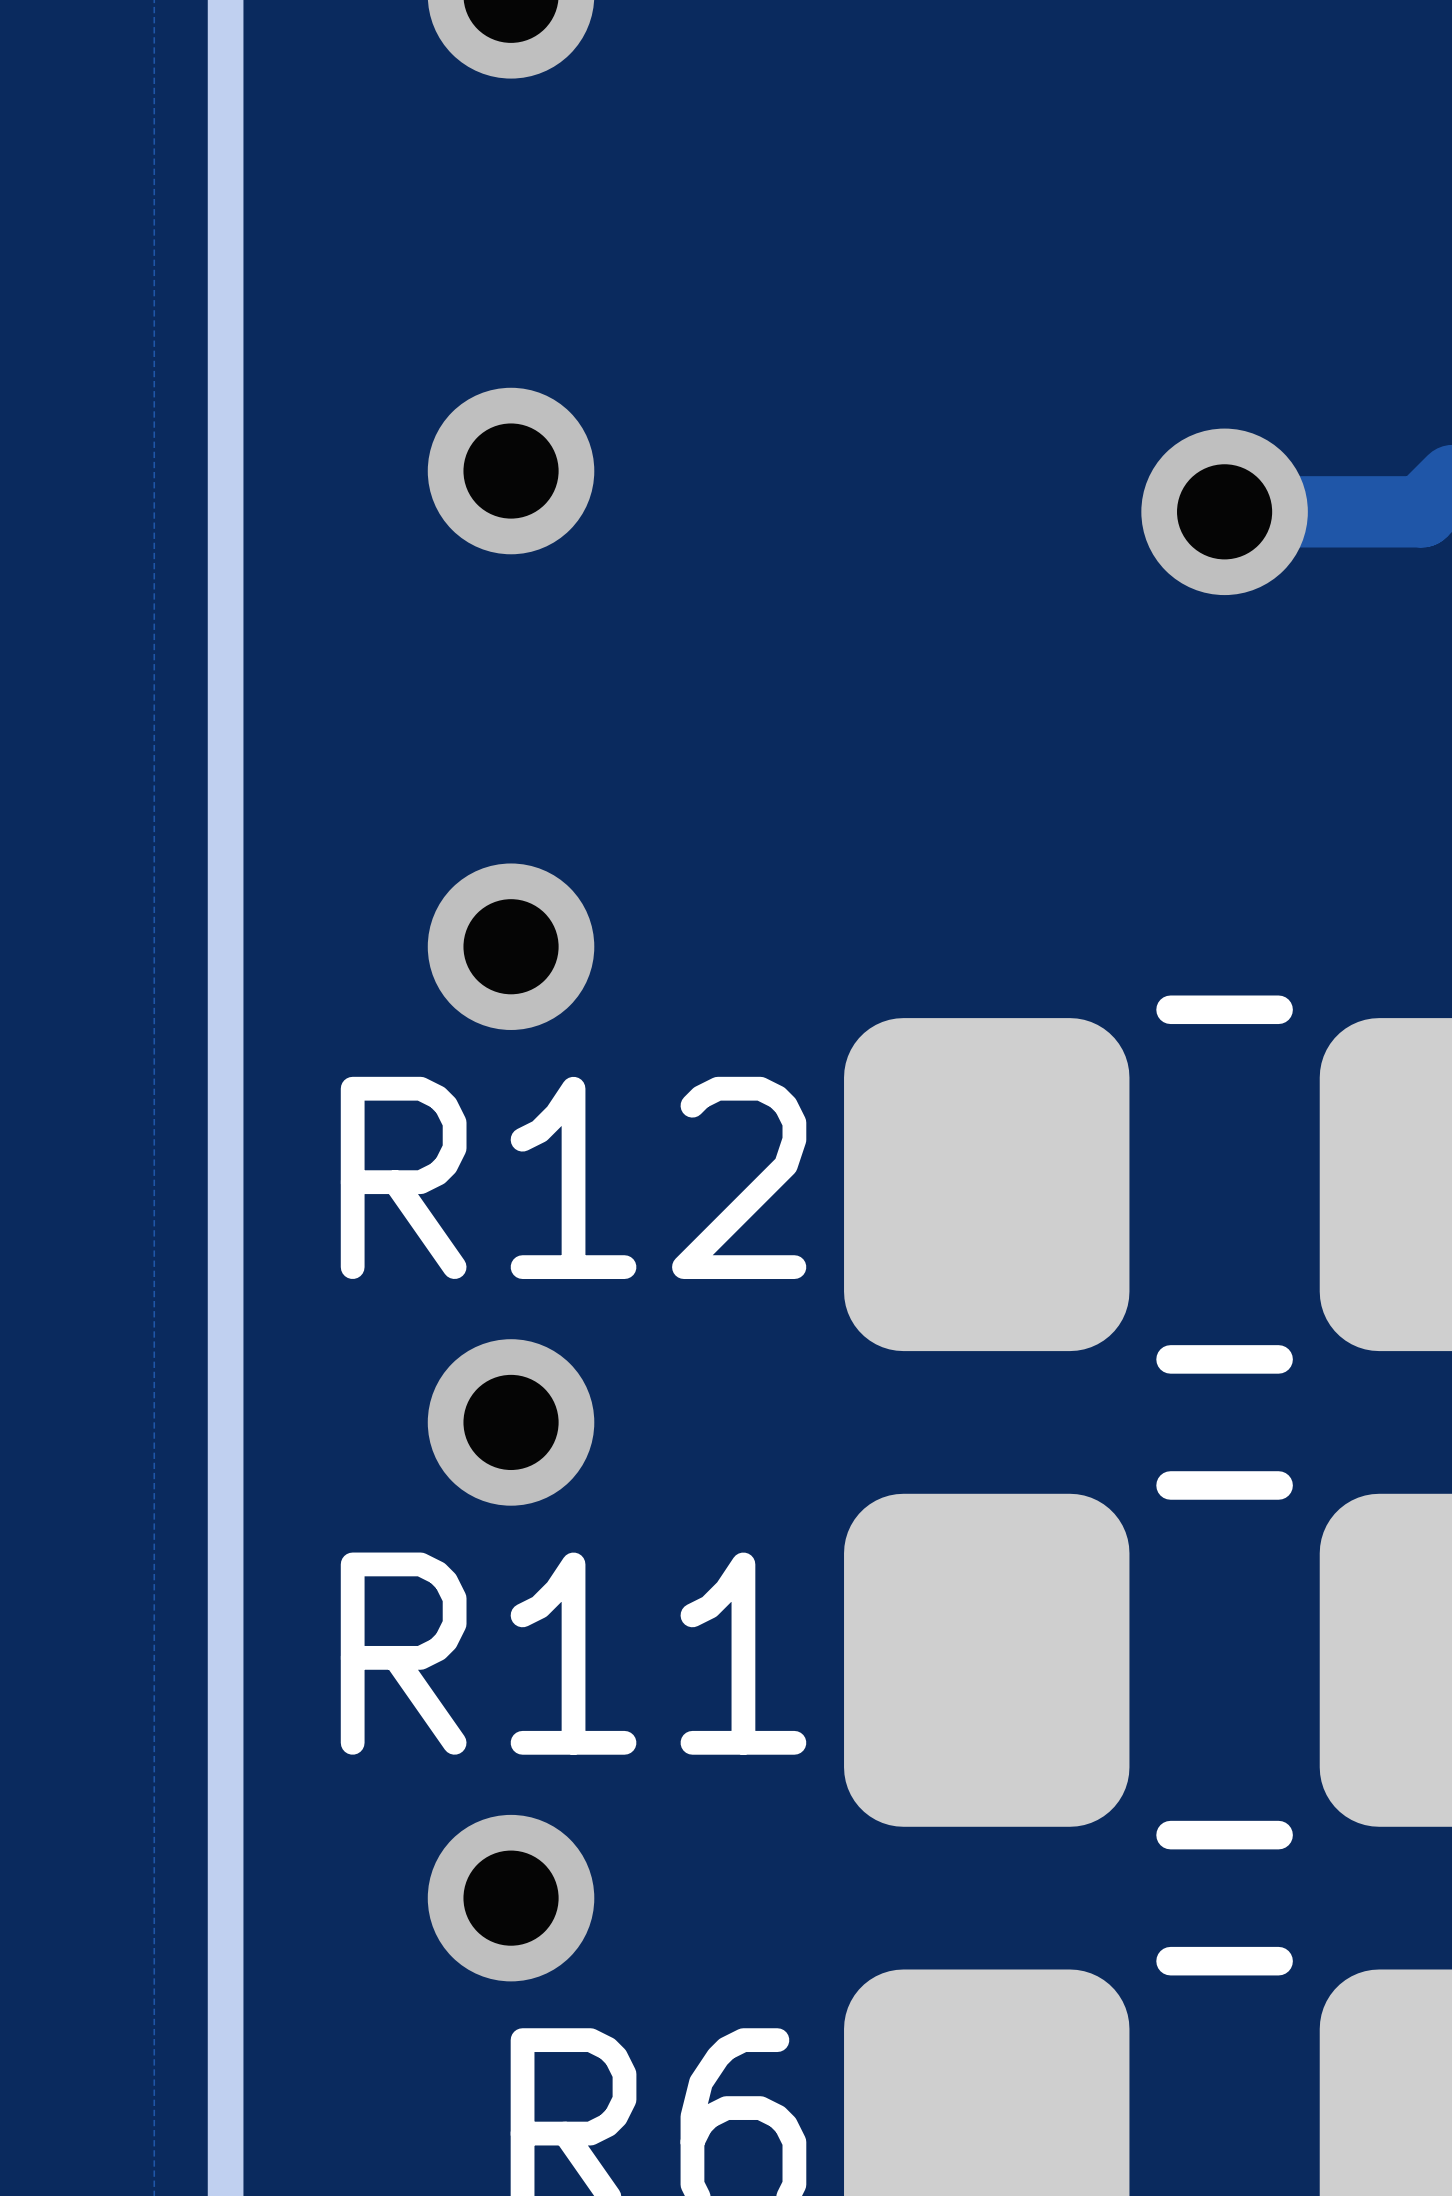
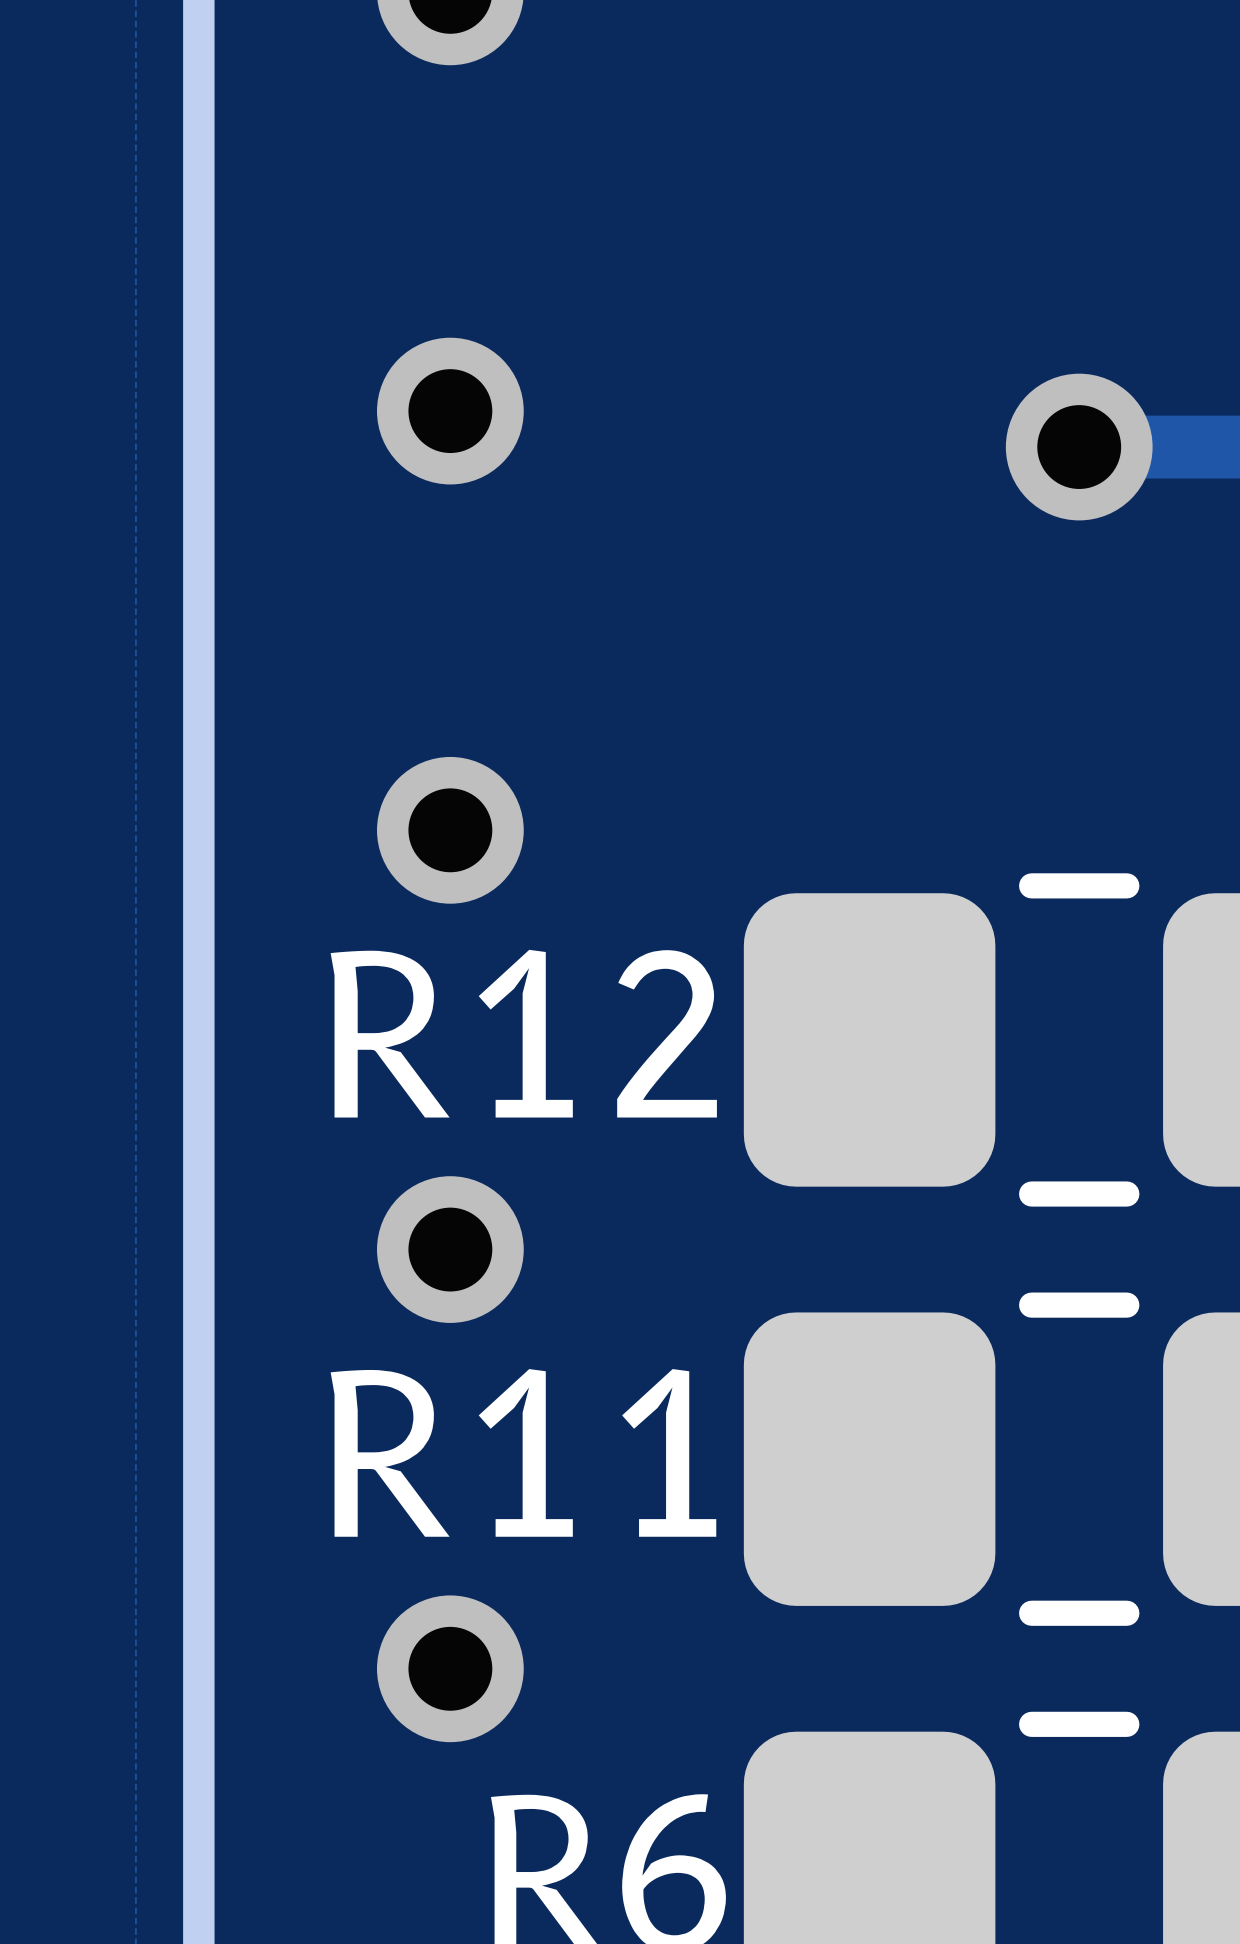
R12 name position: R12 (573, 1177) -> R12 (523, 1033)
R11 name position: R11 (573, 1653) -> R11 (523, 1452)

